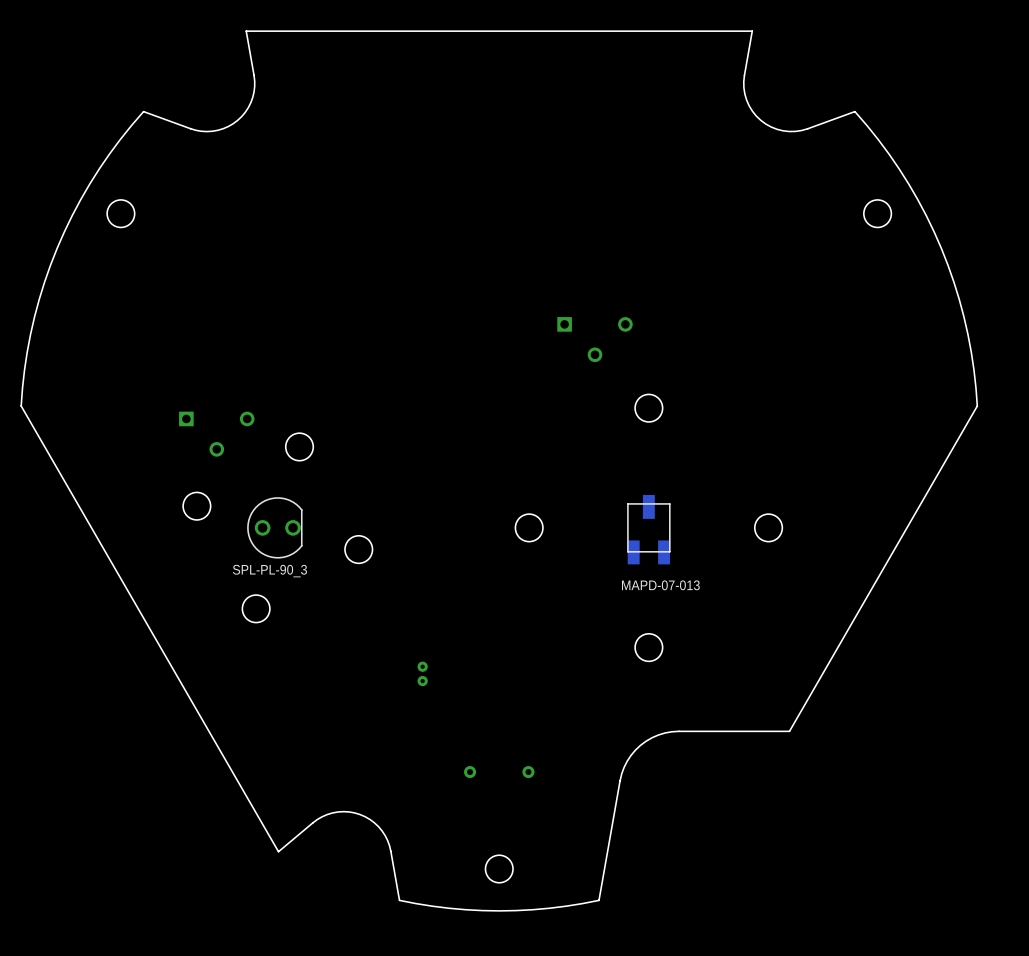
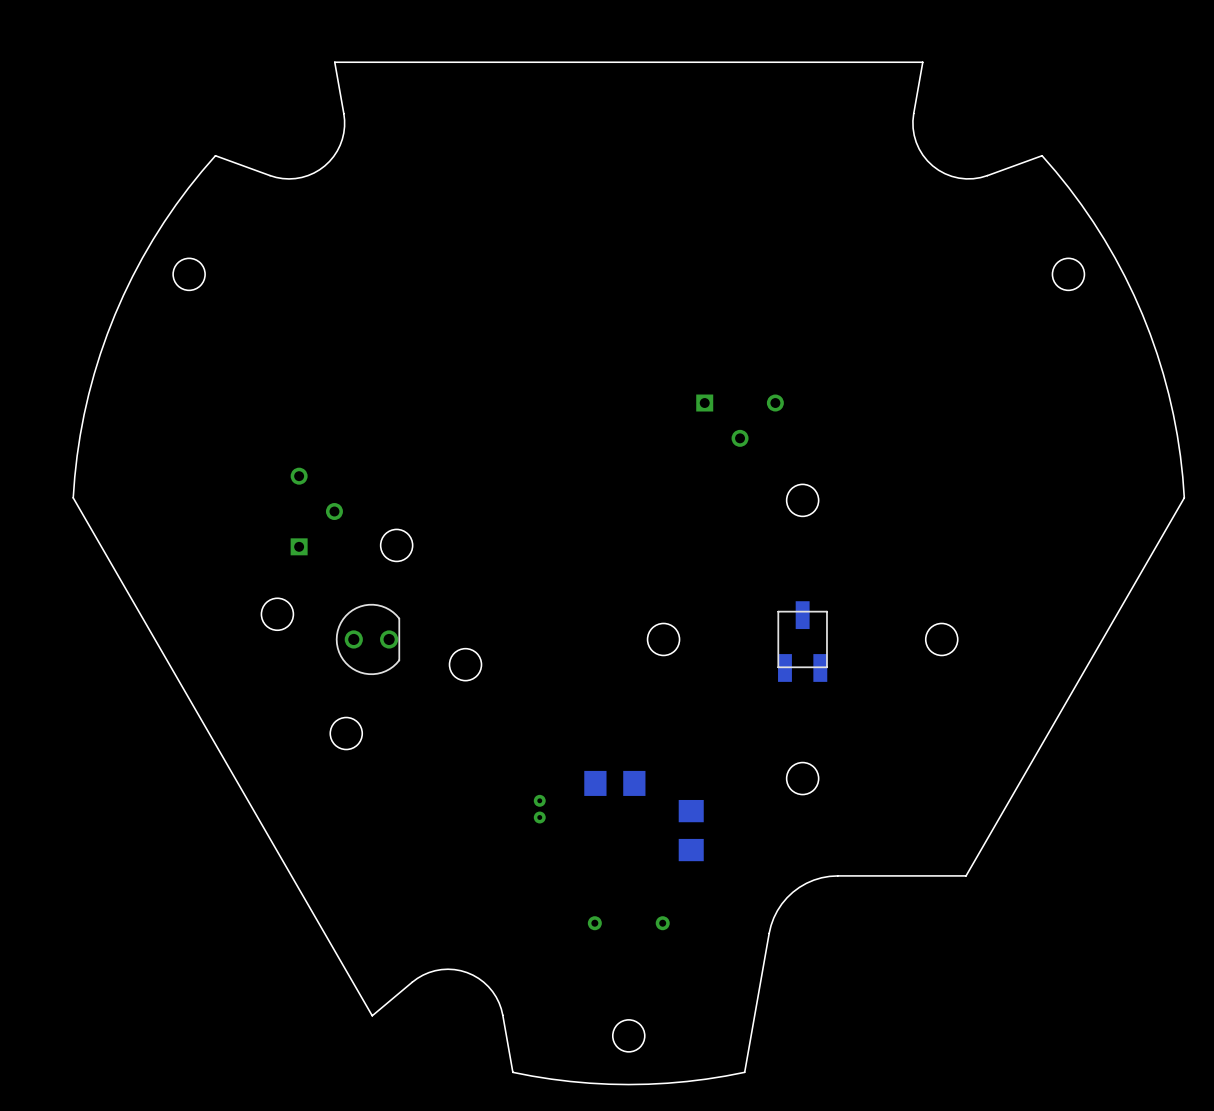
part rotation: 0° (216, 434) -> 90° counterclockwise (316, 511)
text: SPL-PL-90_3 (269, 571) -> none
text: MAPD-07-013 (660, 585) -> none
part: none -> (614, 783)
part: none -> (691, 830)

